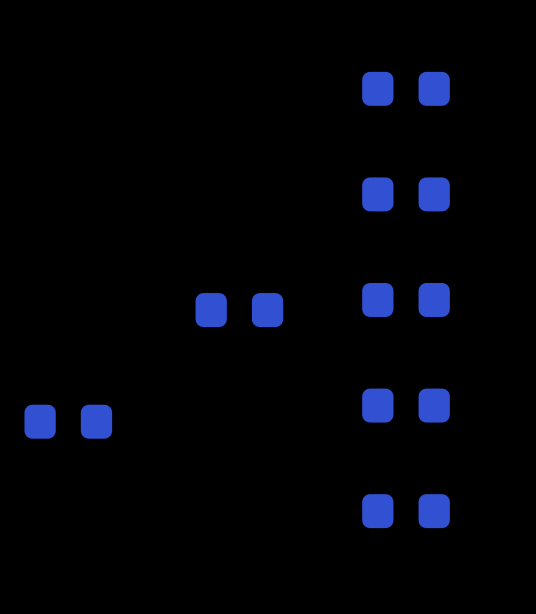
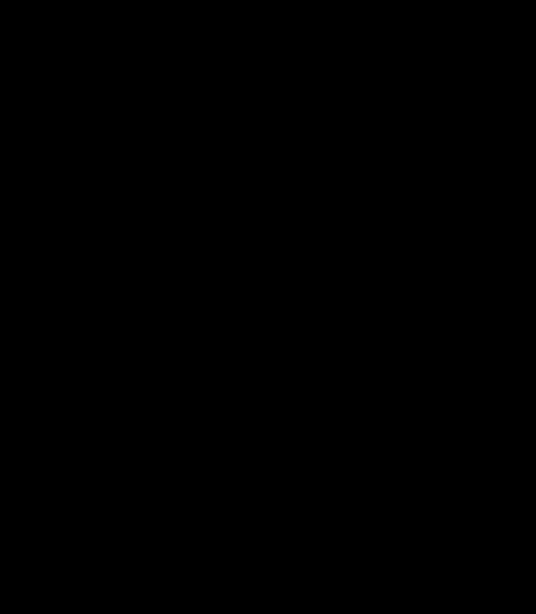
part: (406, 88) -> none
part: (406, 194) -> none
part: (406, 299) -> none
part: (239, 310) -> none
part: (406, 405) -> none
part: (68, 421) -> none
part: (406, 511) -> none

